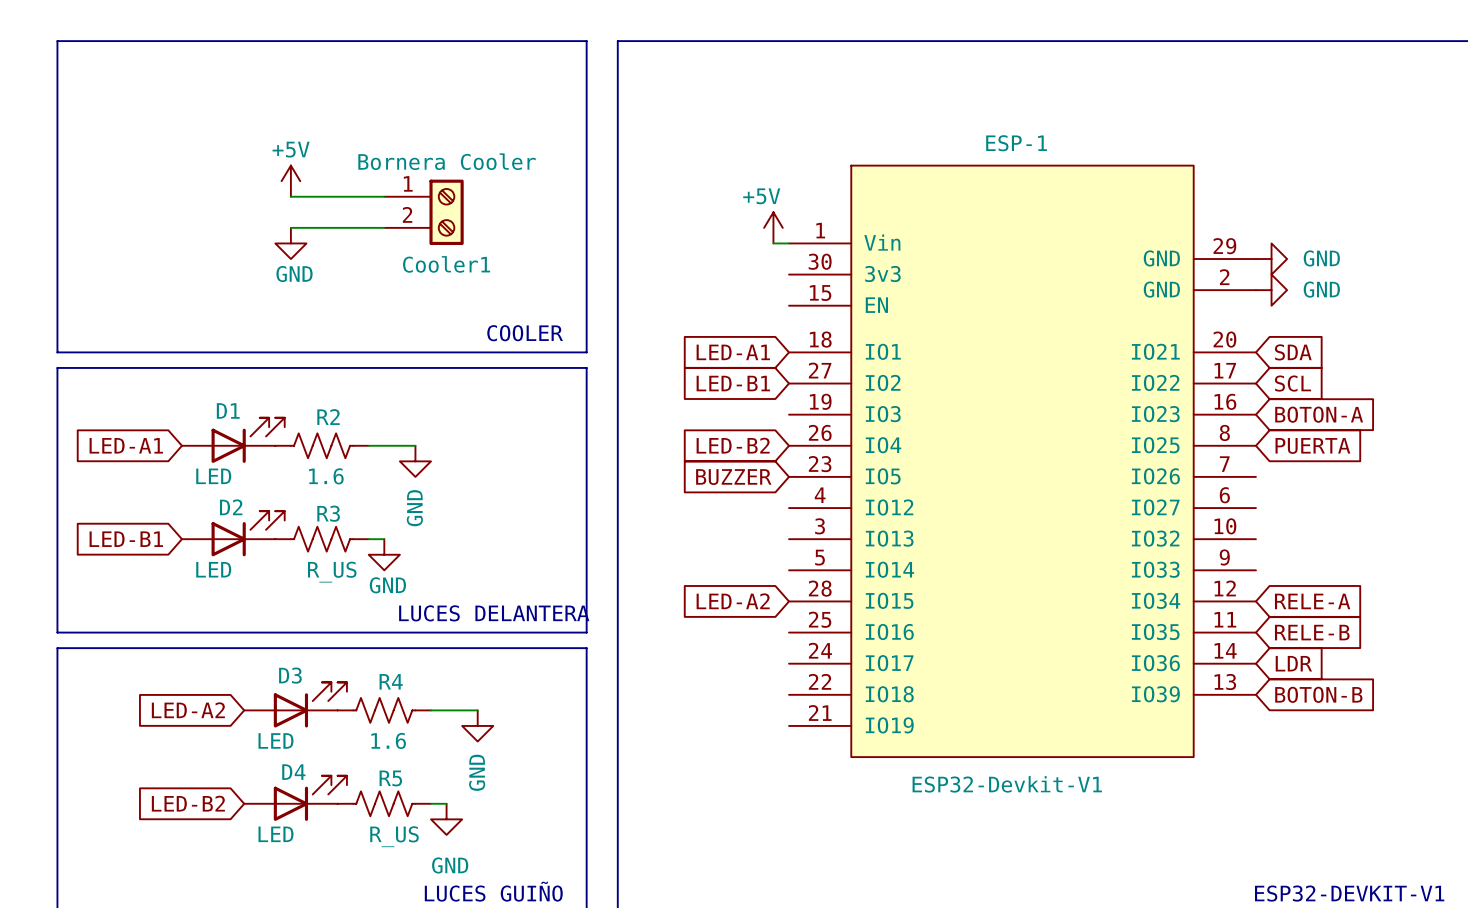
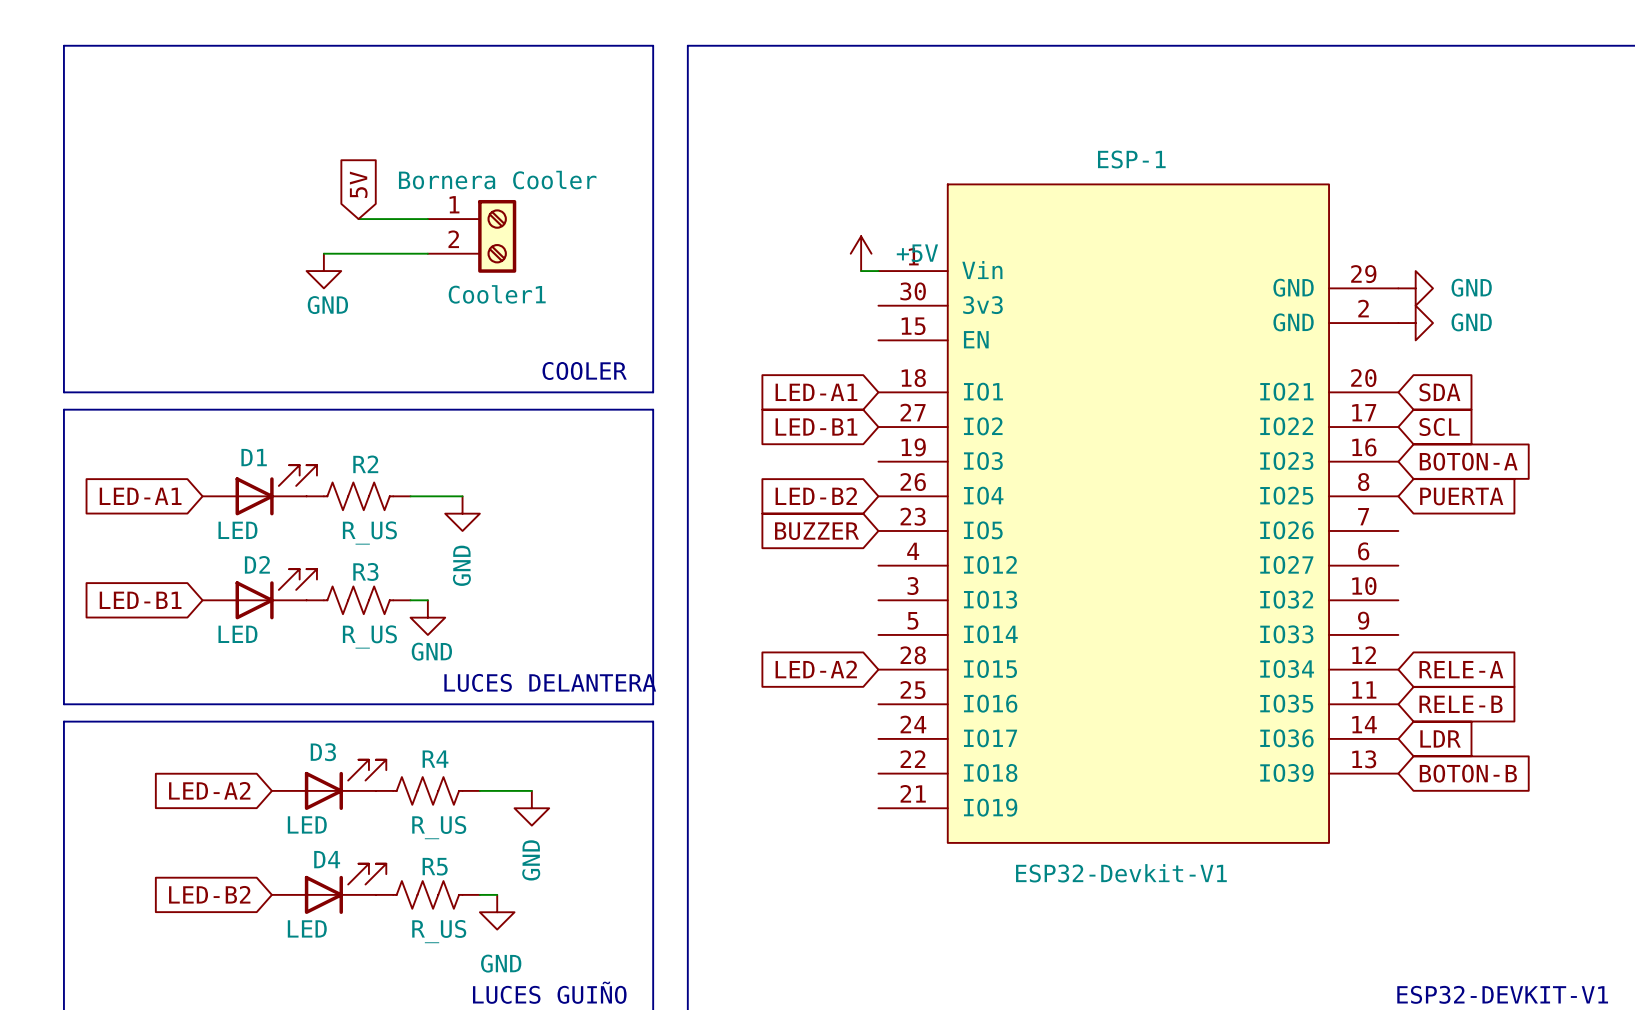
global label: none -> 5V (358, 184)
power symbol: +5V (290, 181) -> none
wire: (290, 196) (322, 196) -> none
power symbol text position: +5V (761, 196) -> +5V (917, 253)
R2 value: 1.6 (326, 476) -> R_US (369, 532)
R4 value: 1.6 (388, 740) -> R_US (439, 827)

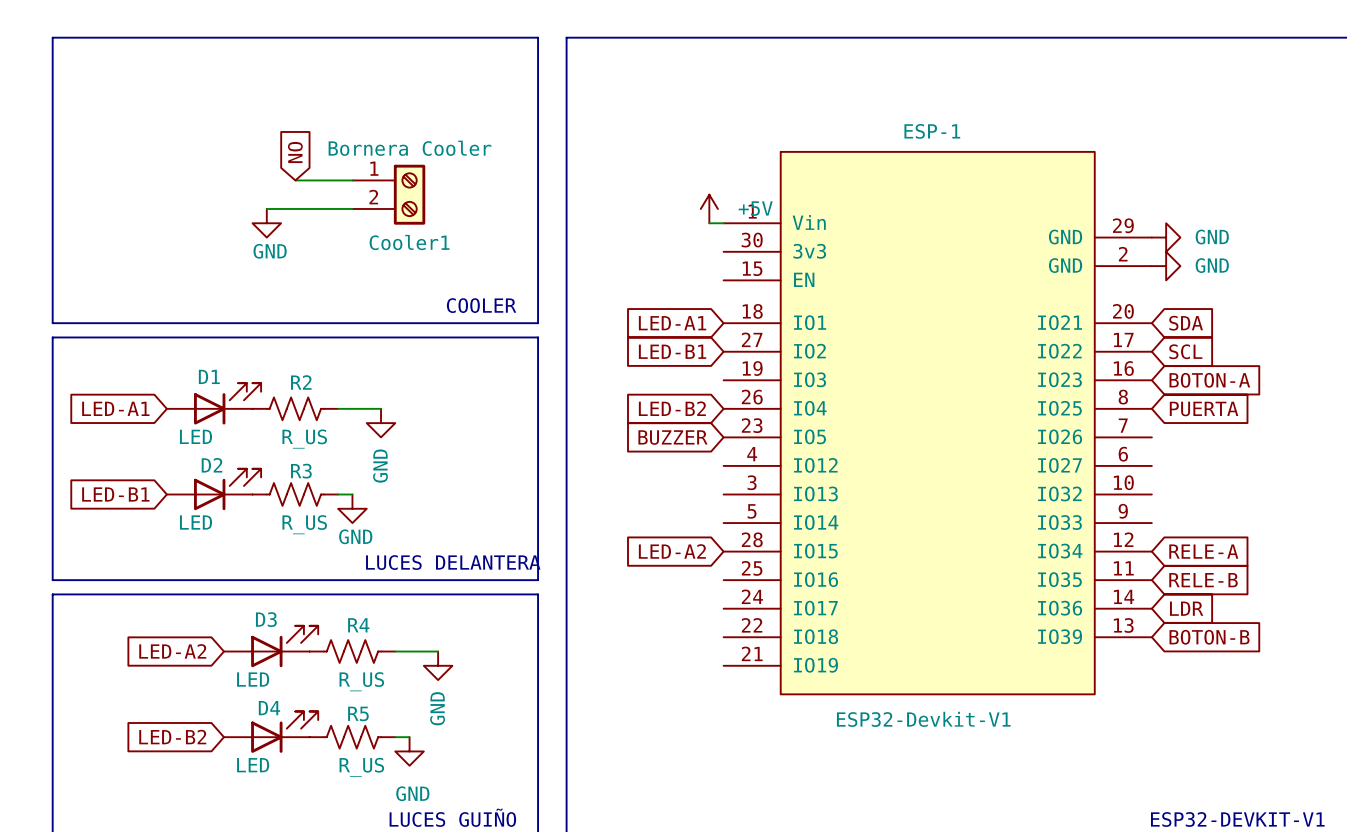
global label: 5V (358, 184) -> NO (295, 152)

